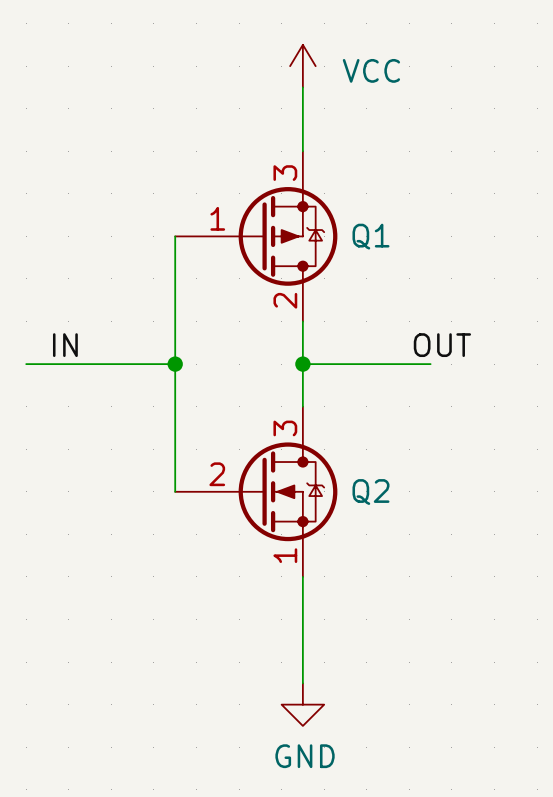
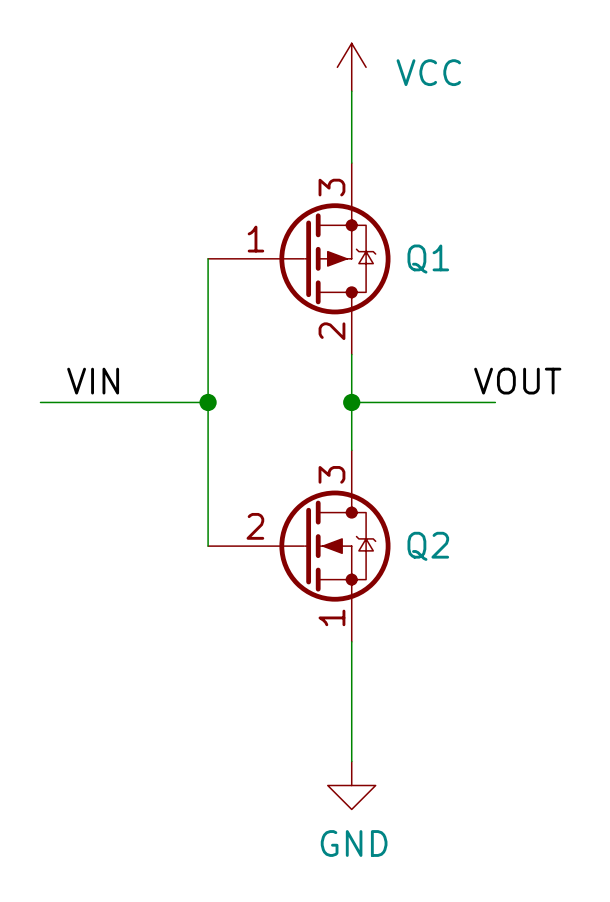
label: IN (65, 345) -> VIN (93, 381)
label: OUT (442, 345) -> VOUT (517, 381)

